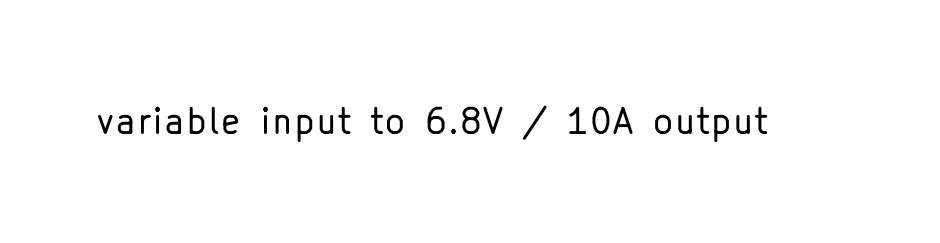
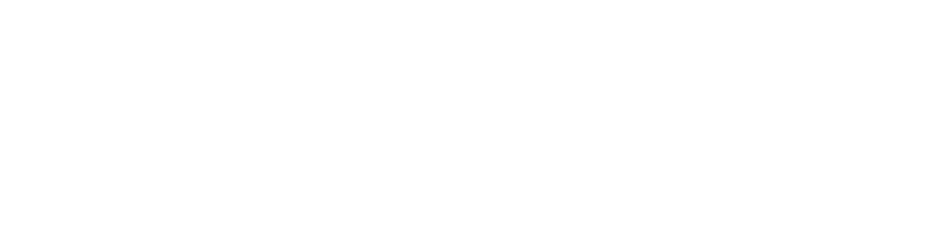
text: variable input to 6.8V / 10A output (432, 123) -> none

